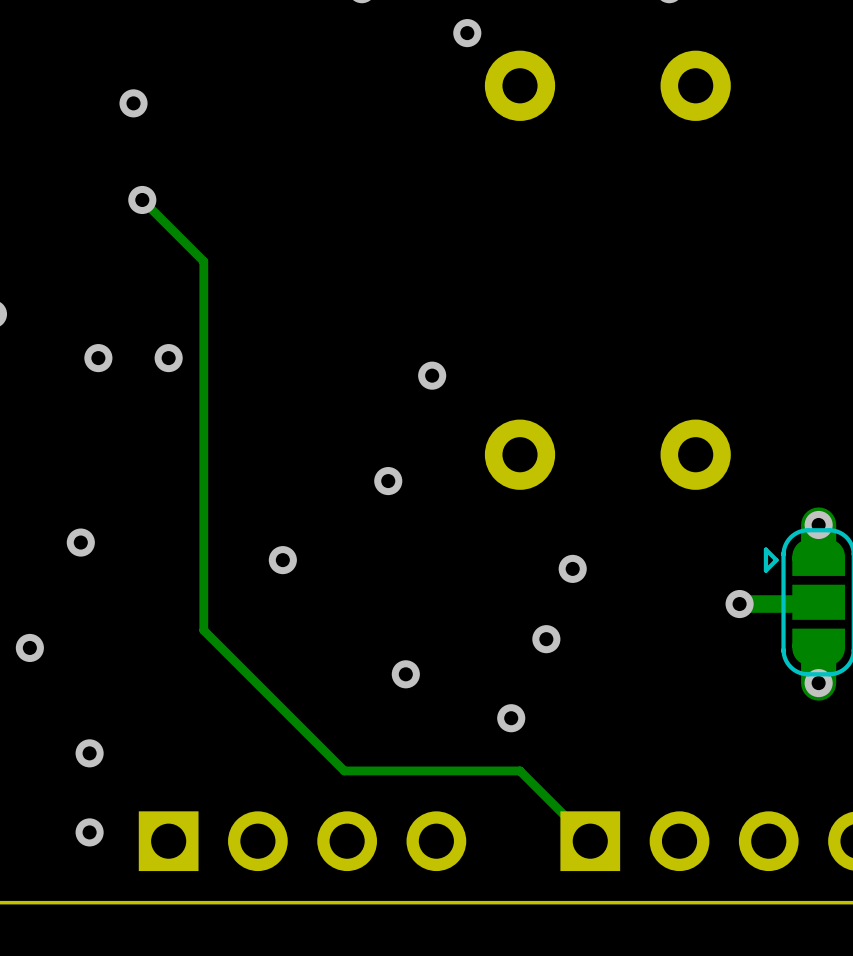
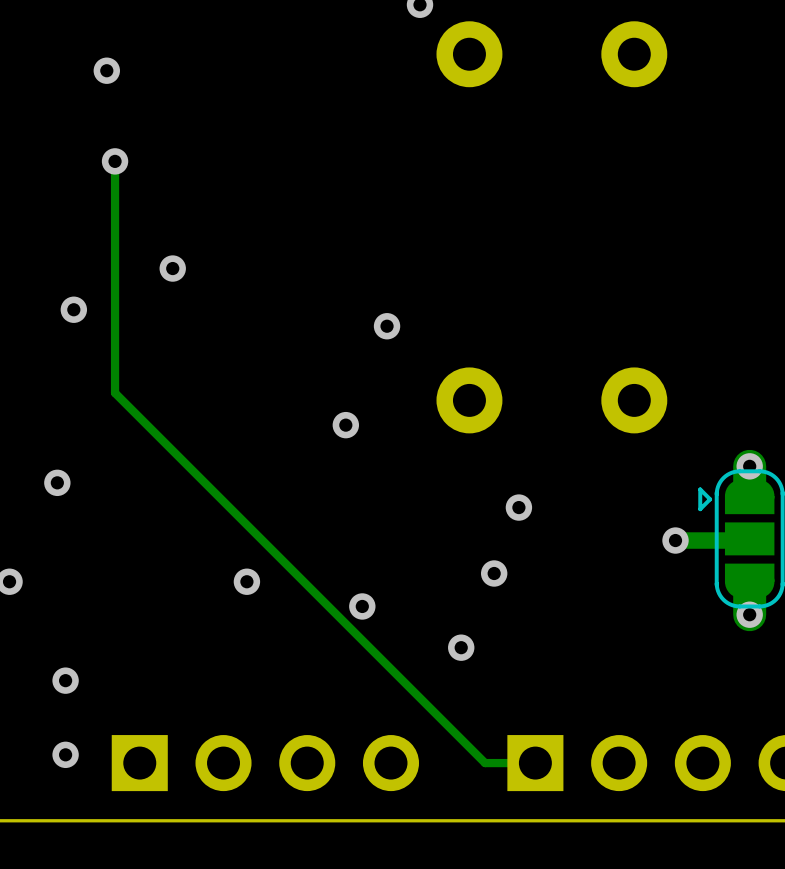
track: (142, 199) (203, 261) (203, 630) (344, 770) (520, 770) (590, 841) -> (115, 161) (115, 393) (485, 763) (535, 763)
via position: (168, 358) -> (172, 268)
via position: (282, 560) -> (246, 581)

